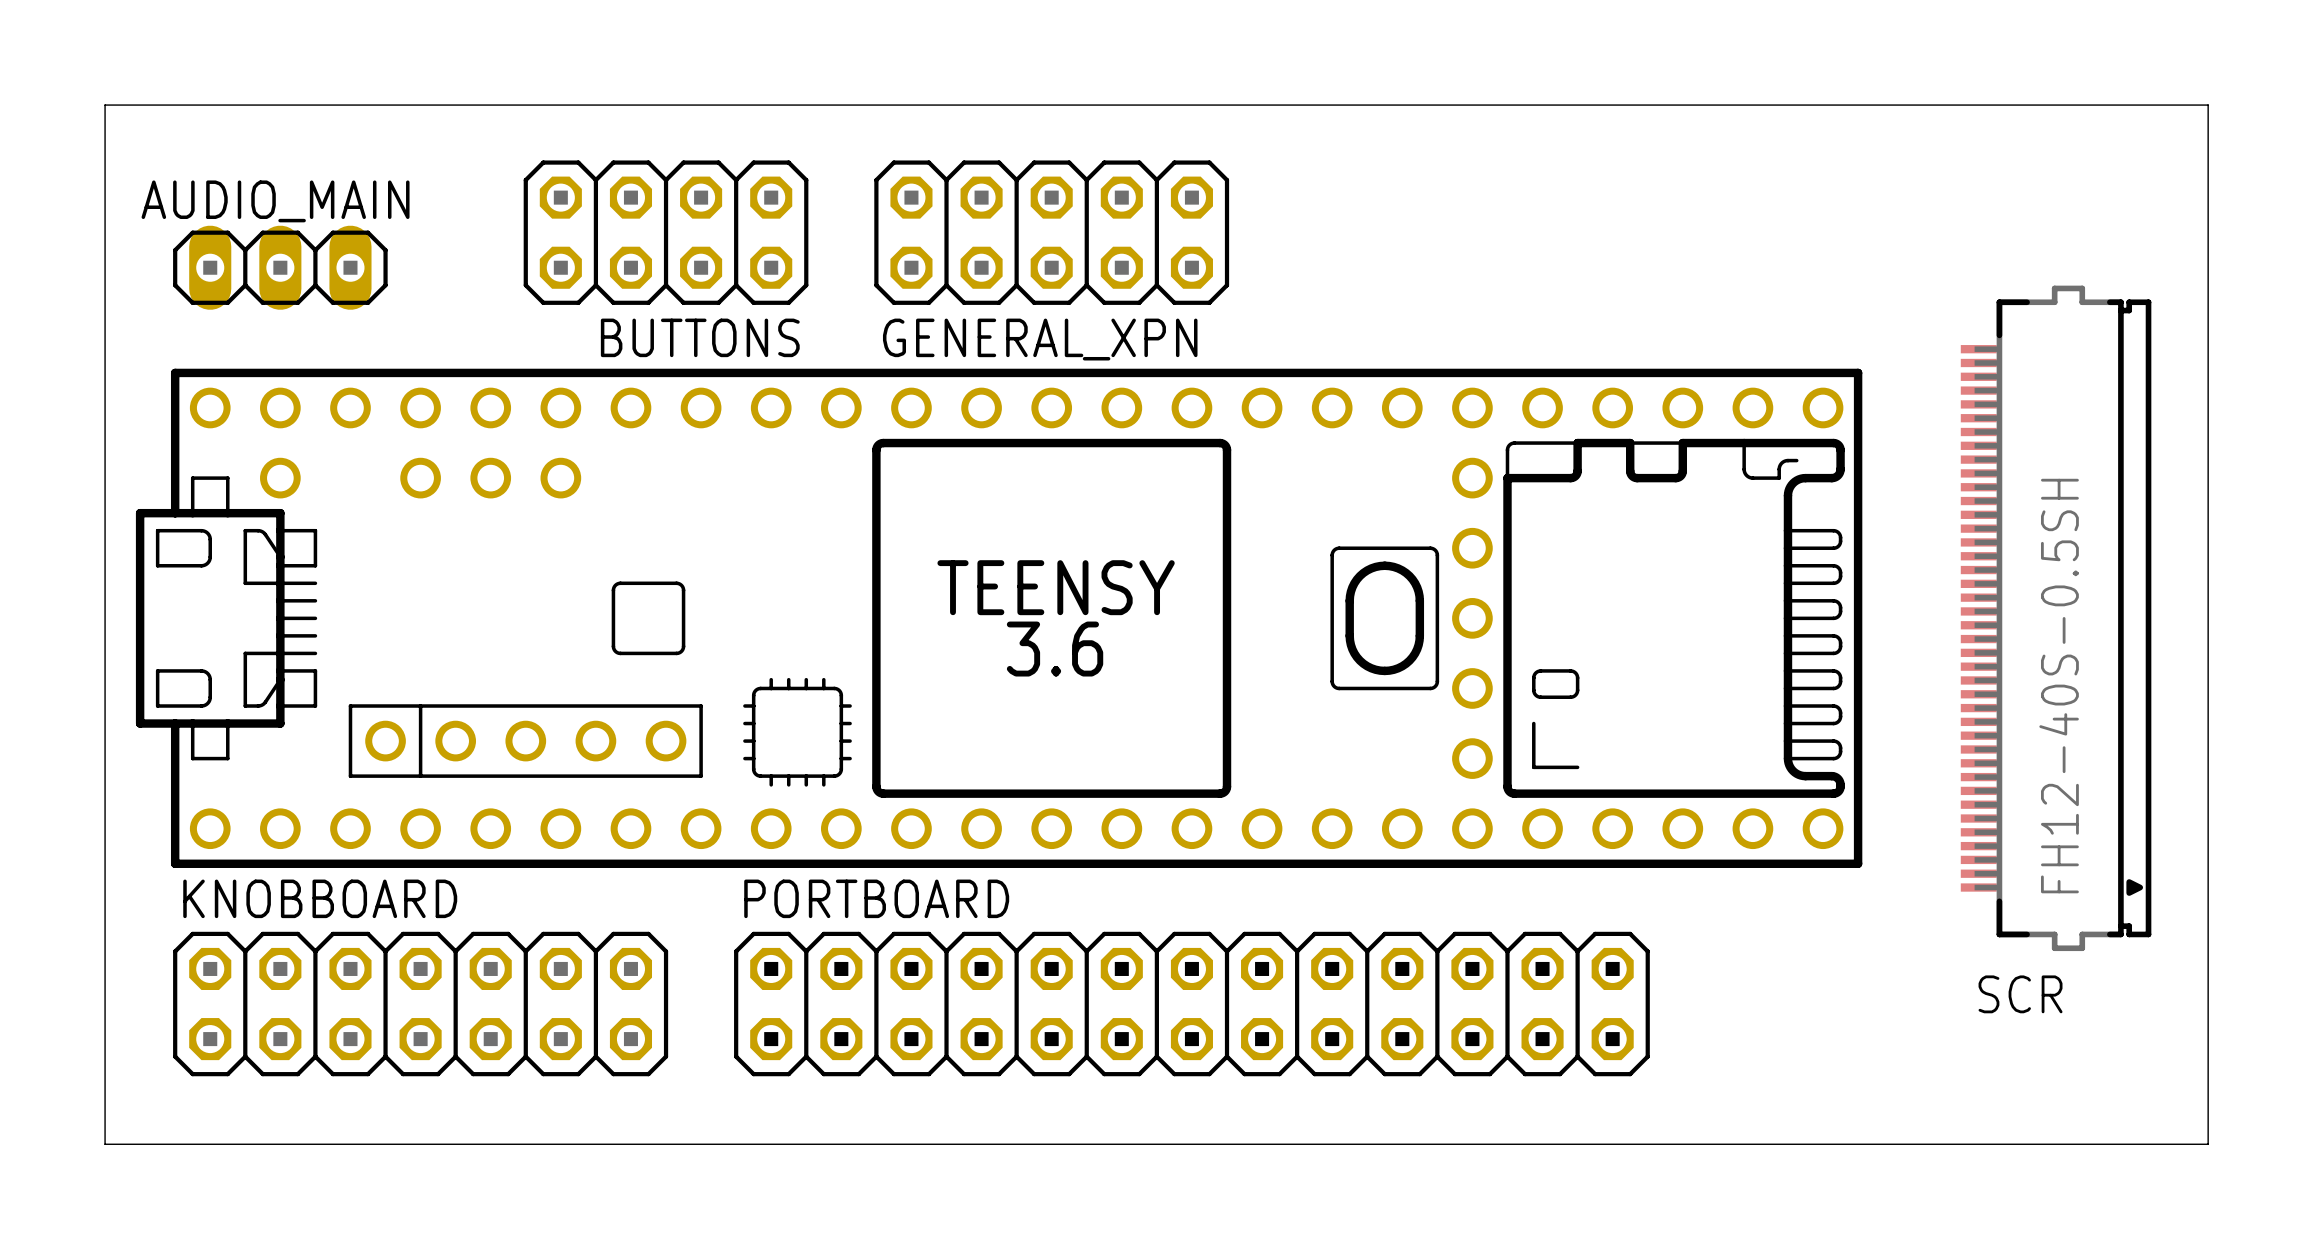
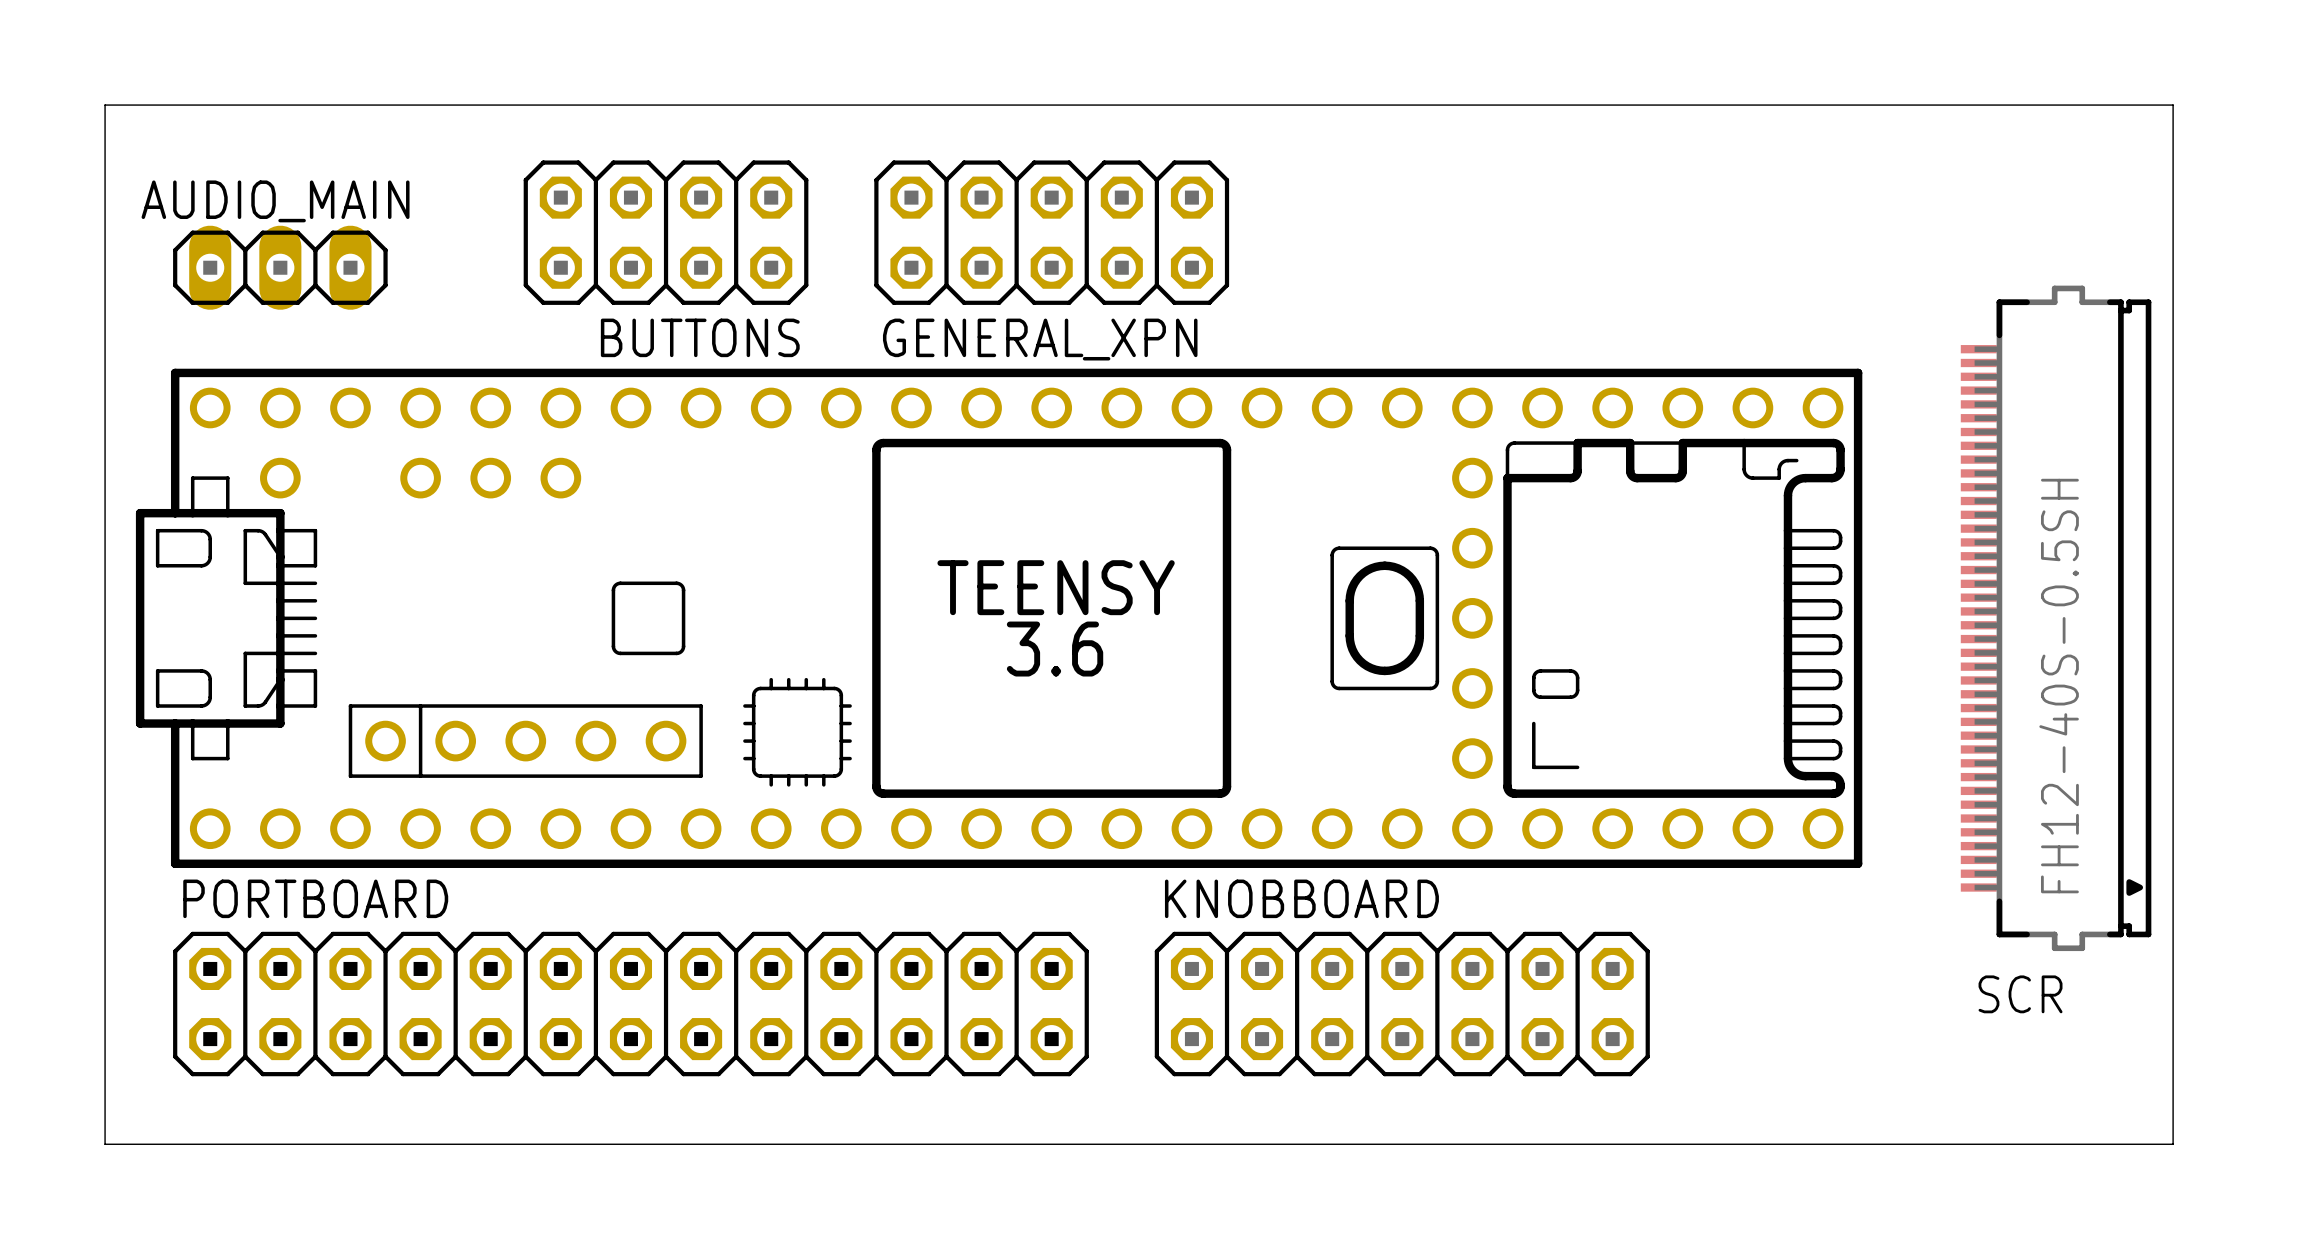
board edge: (2173, 105) (2208, 105) (2208, 1144) (2173, 1144) -> (2173, 105) (2173, 1144)
KNOBBOARD: (420, 1004) -> none
PORTBOARD position: (1191, 1004) -> (630, 1004)
KNOBBOARD: none -> (1402, 1004)

